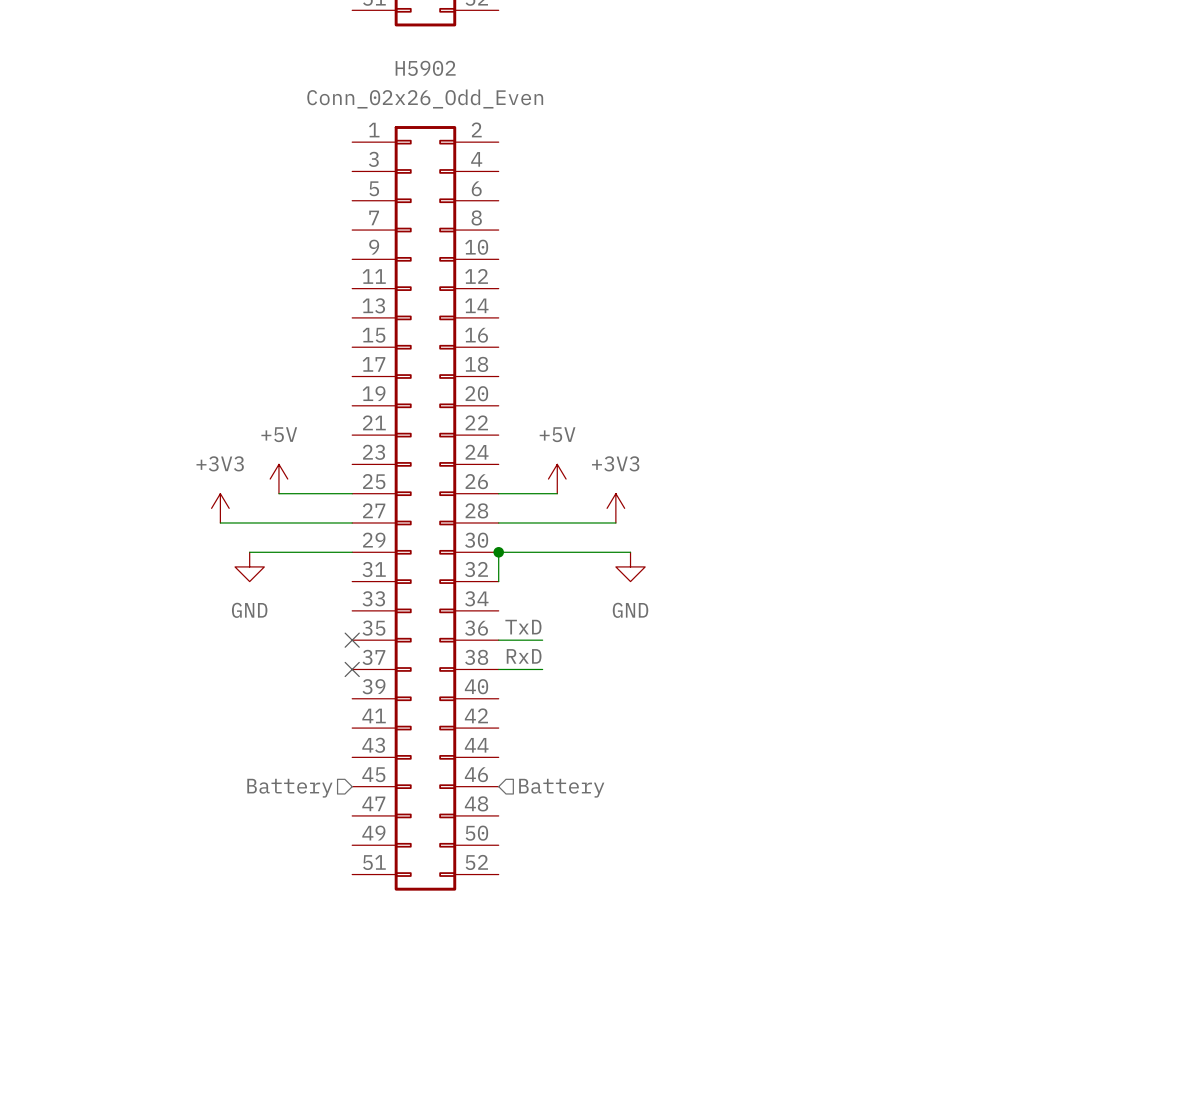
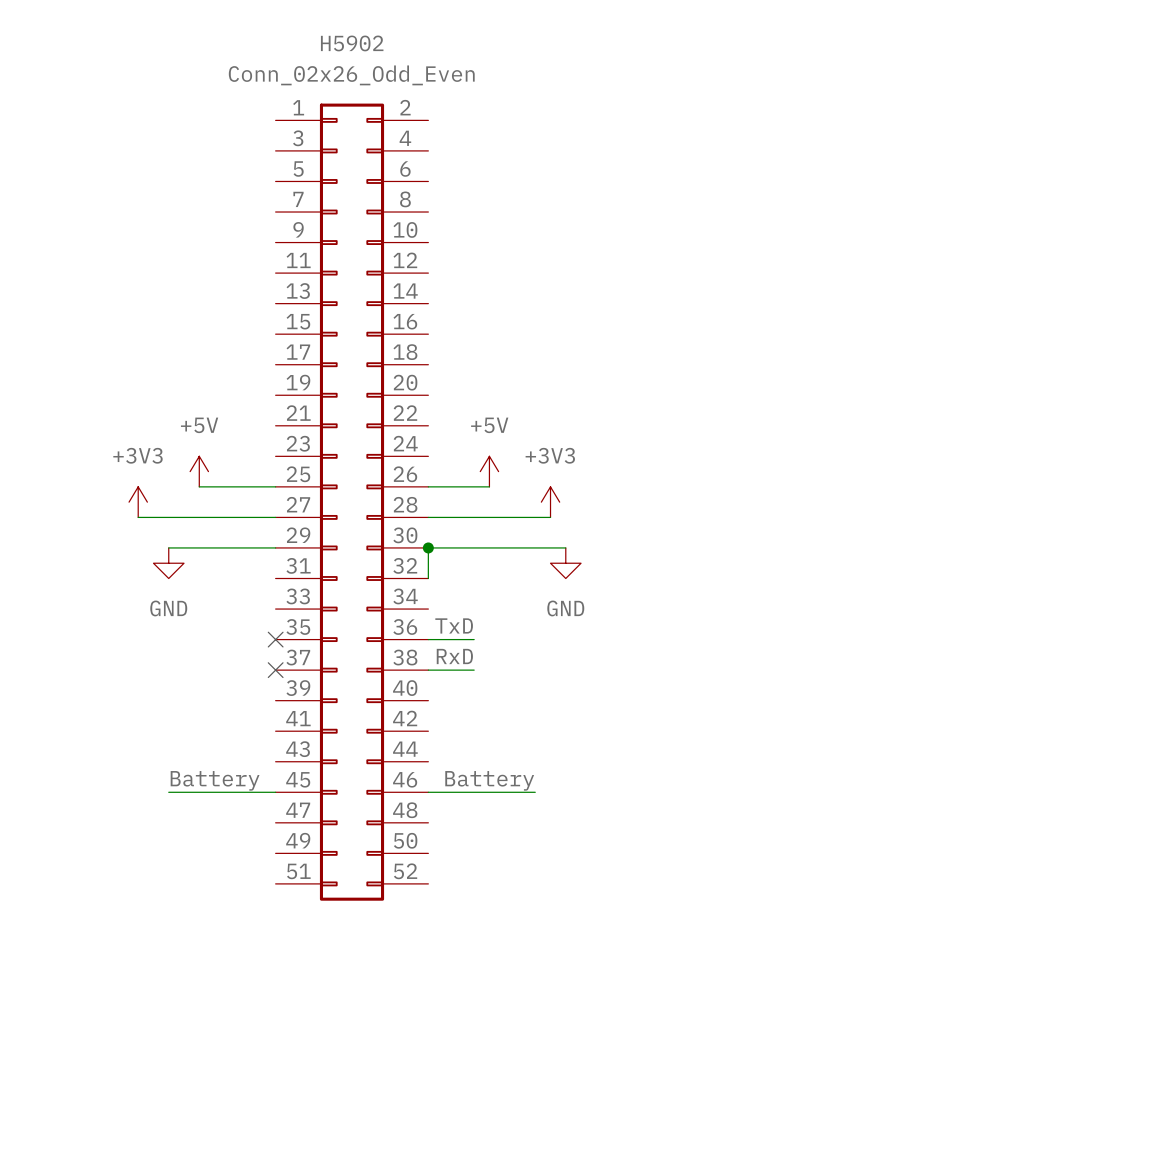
label: none -> Battery (215, 780)
label: none -> Battery (489, 780)
wire: none -> (168, 792) (275, 792)
wire: none -> (428, 792) (535, 792)
hierarchical label: Battery (289, 788) -> none
hierarchical label: Battery (561, 788) -> none

